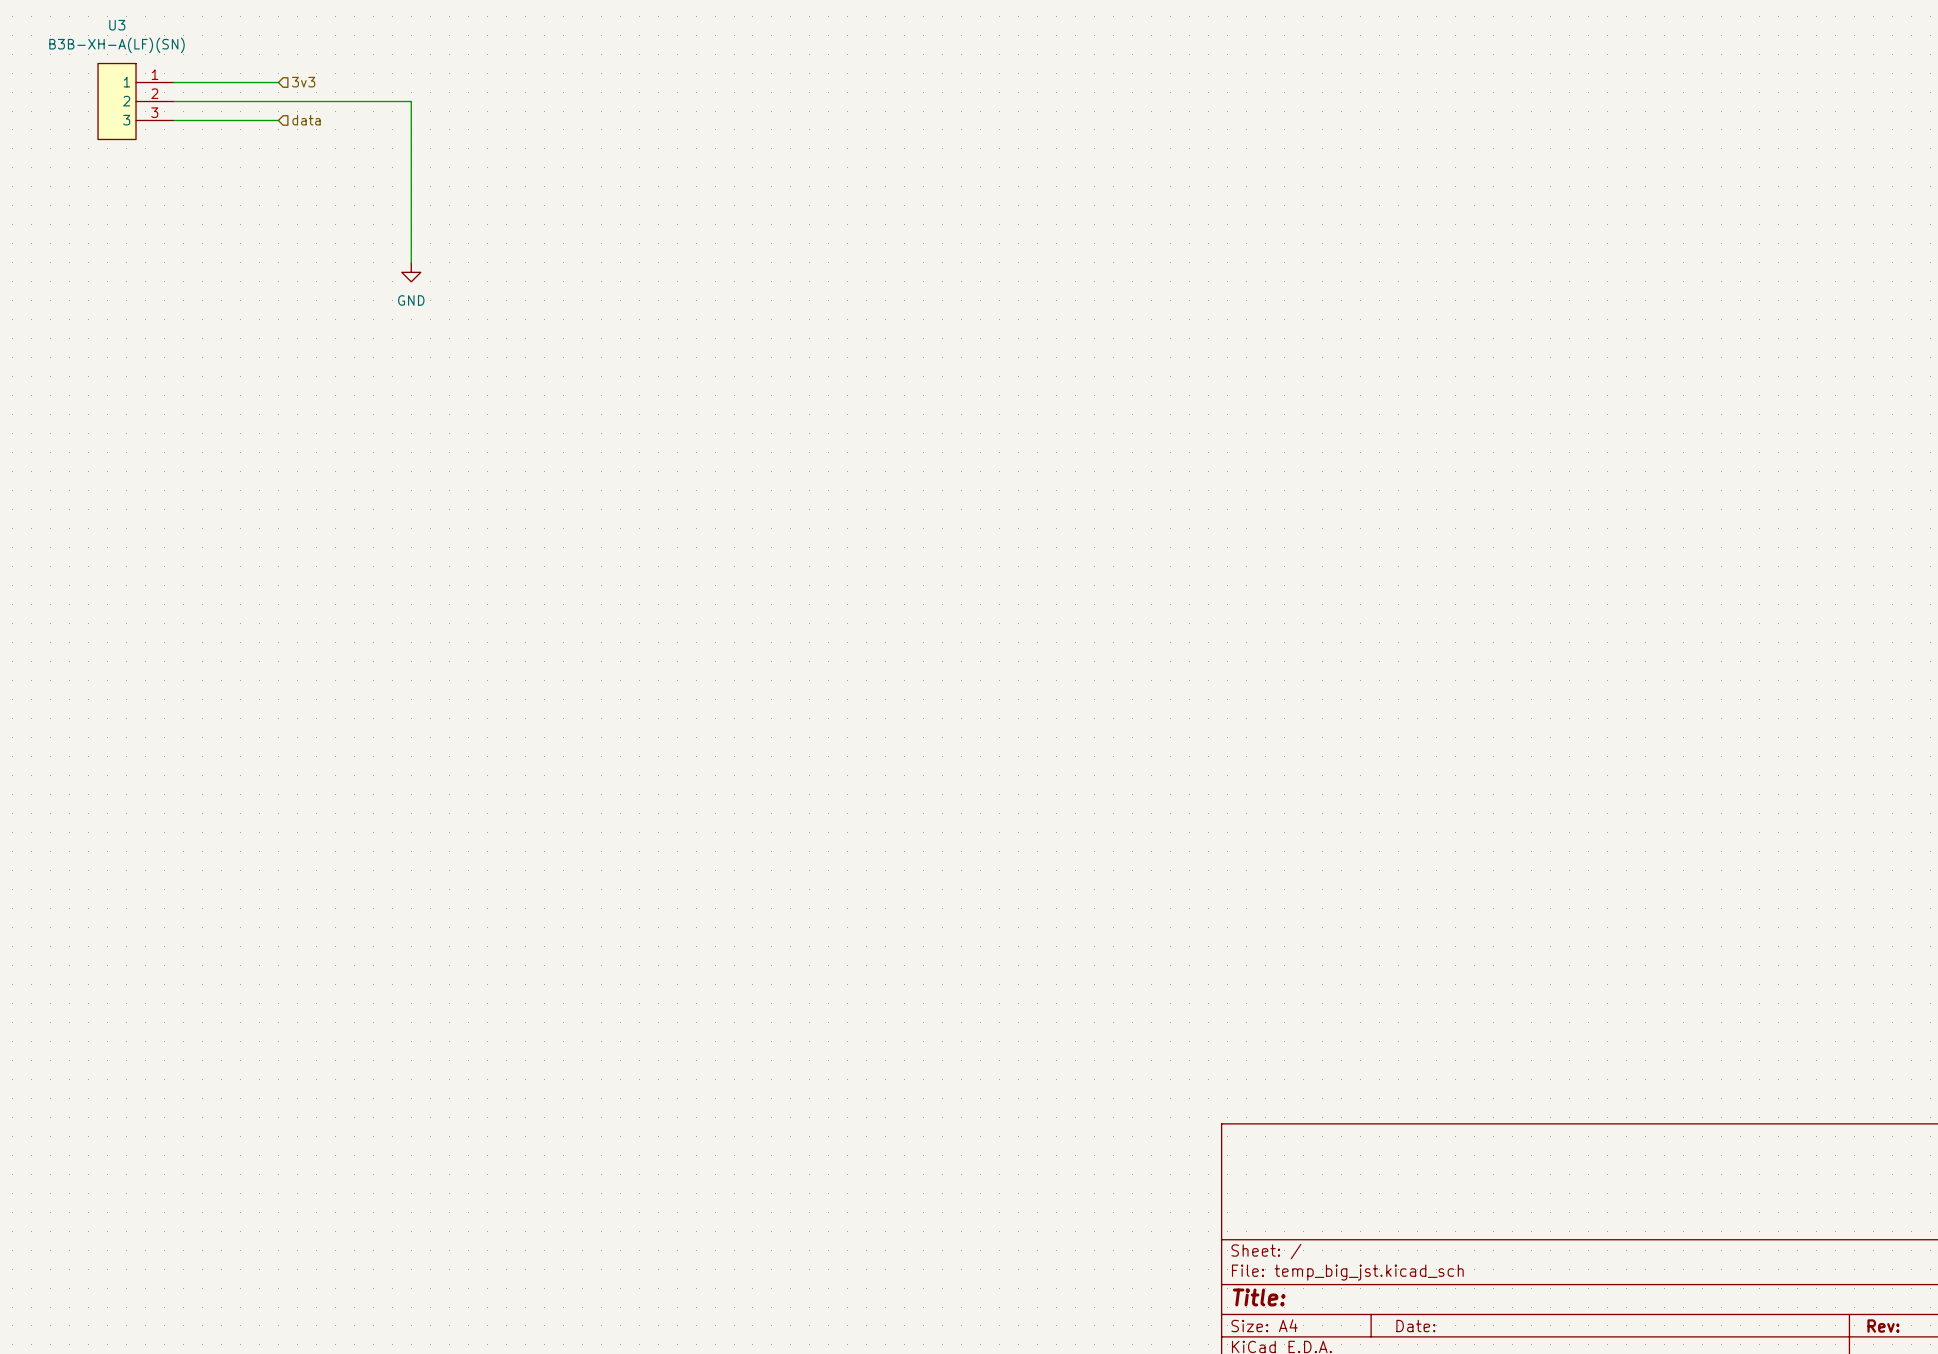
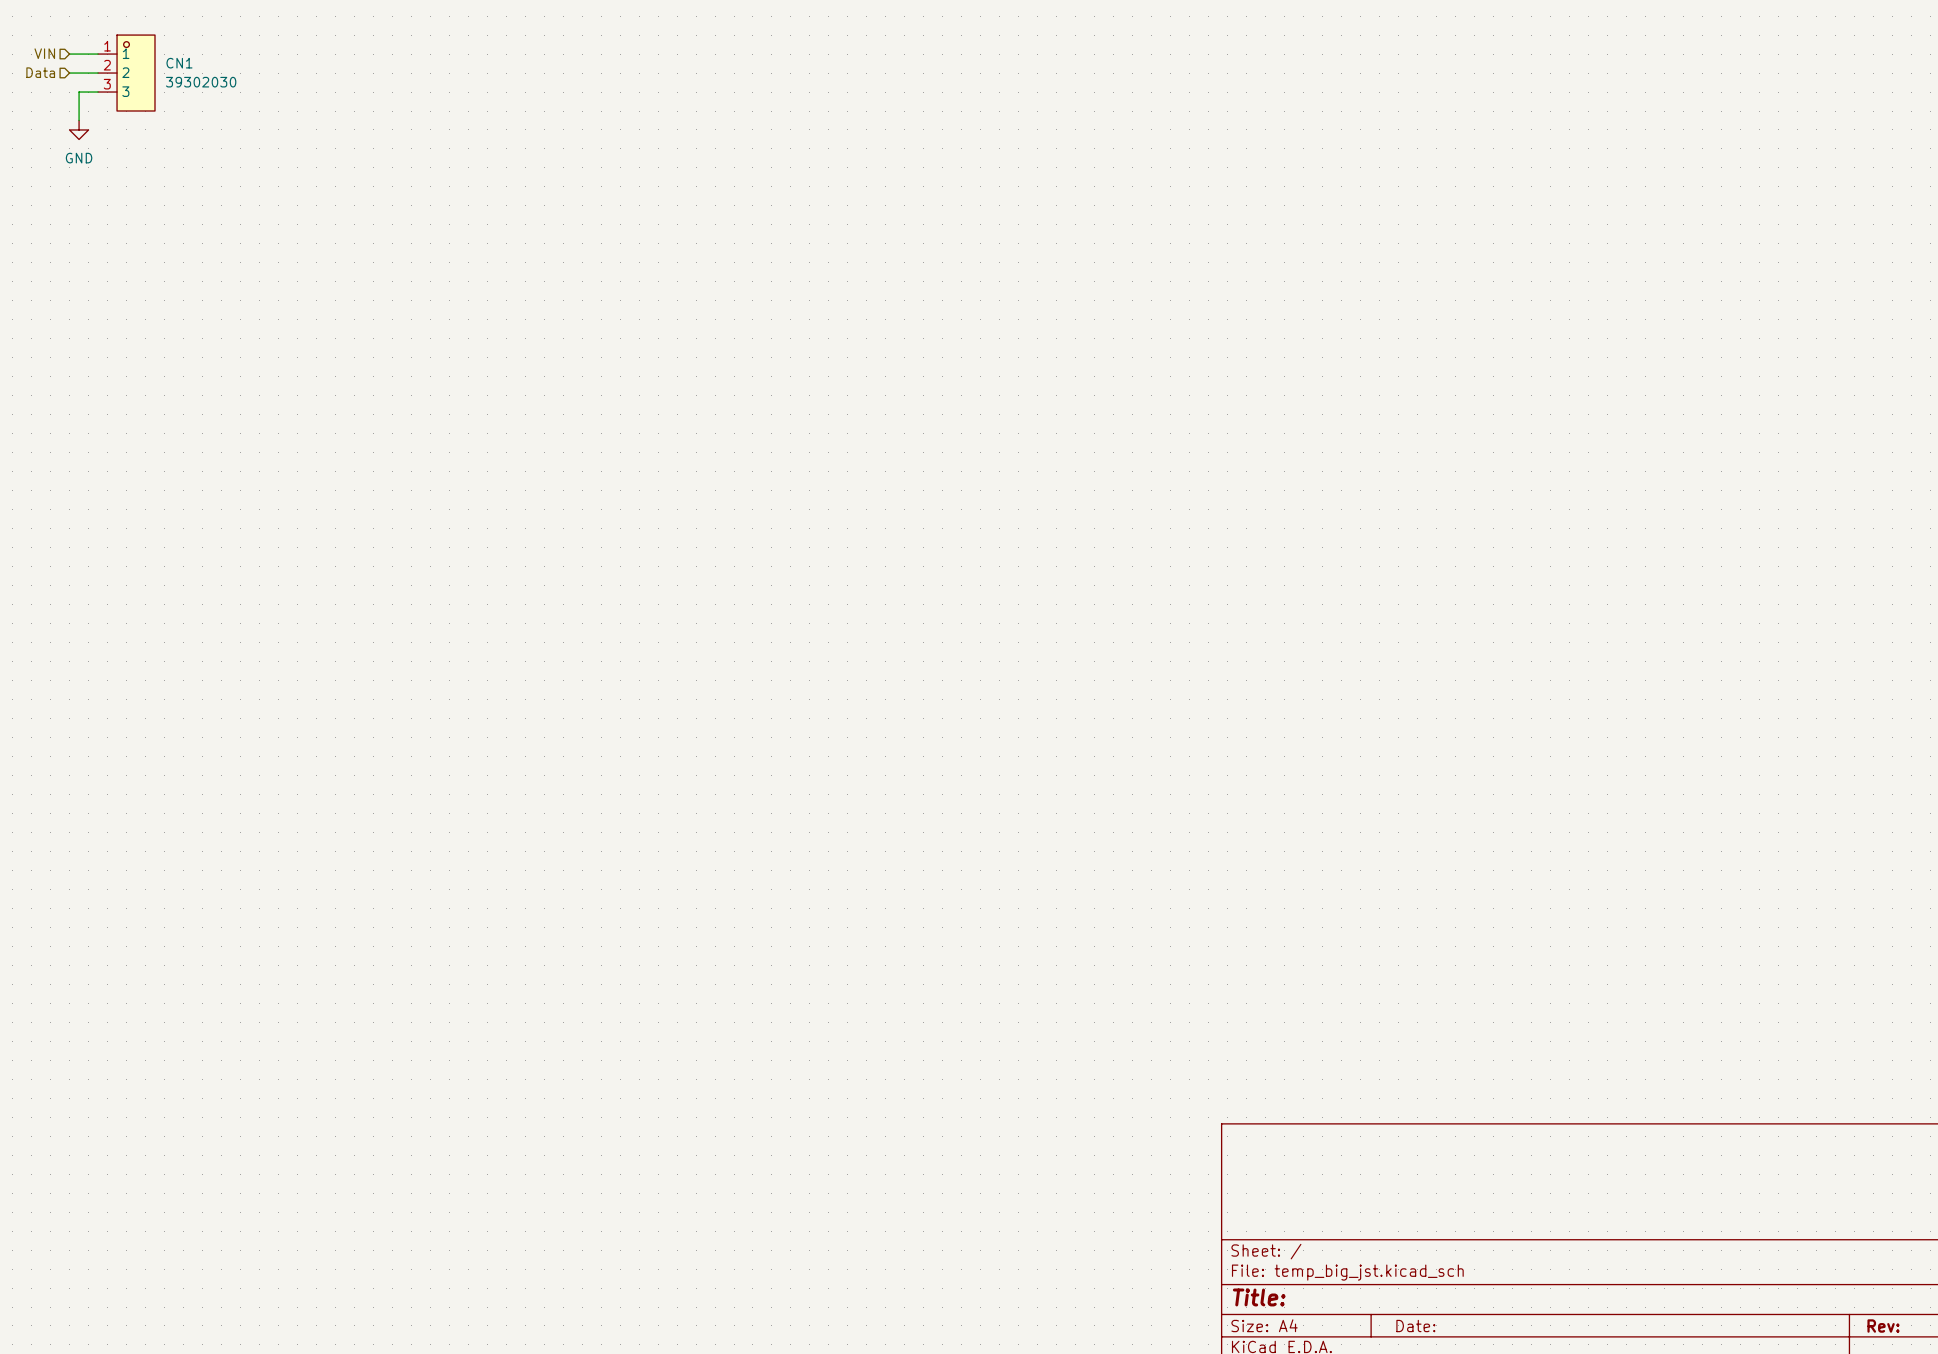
hierarchical label: none -> VIN (44, 53)
wire: none -> (69, 54) (98, 54)
hierarchical label: none -> Data (40, 72)
wire: none -> (69, 73) (98, 73)
CN1: none -> 39302030 (126, 73)
wire: (173, 82) (278, 82) -> none
hierarchical label: 3v3 (303, 82) -> none
wire: none -> (98, 92) (79, 92) (79, 120)
U3: B3B-XH-A(LF)(SN) (136, 101) -> none
wire: (173, 101) (411, 101) (411, 262) -> none
wire: (173, 120) (278, 120) -> none
hierarchical label: data (306, 120) -> none
power symbol: none -> GND (79, 129)
power symbol: GND (411, 272) -> none

